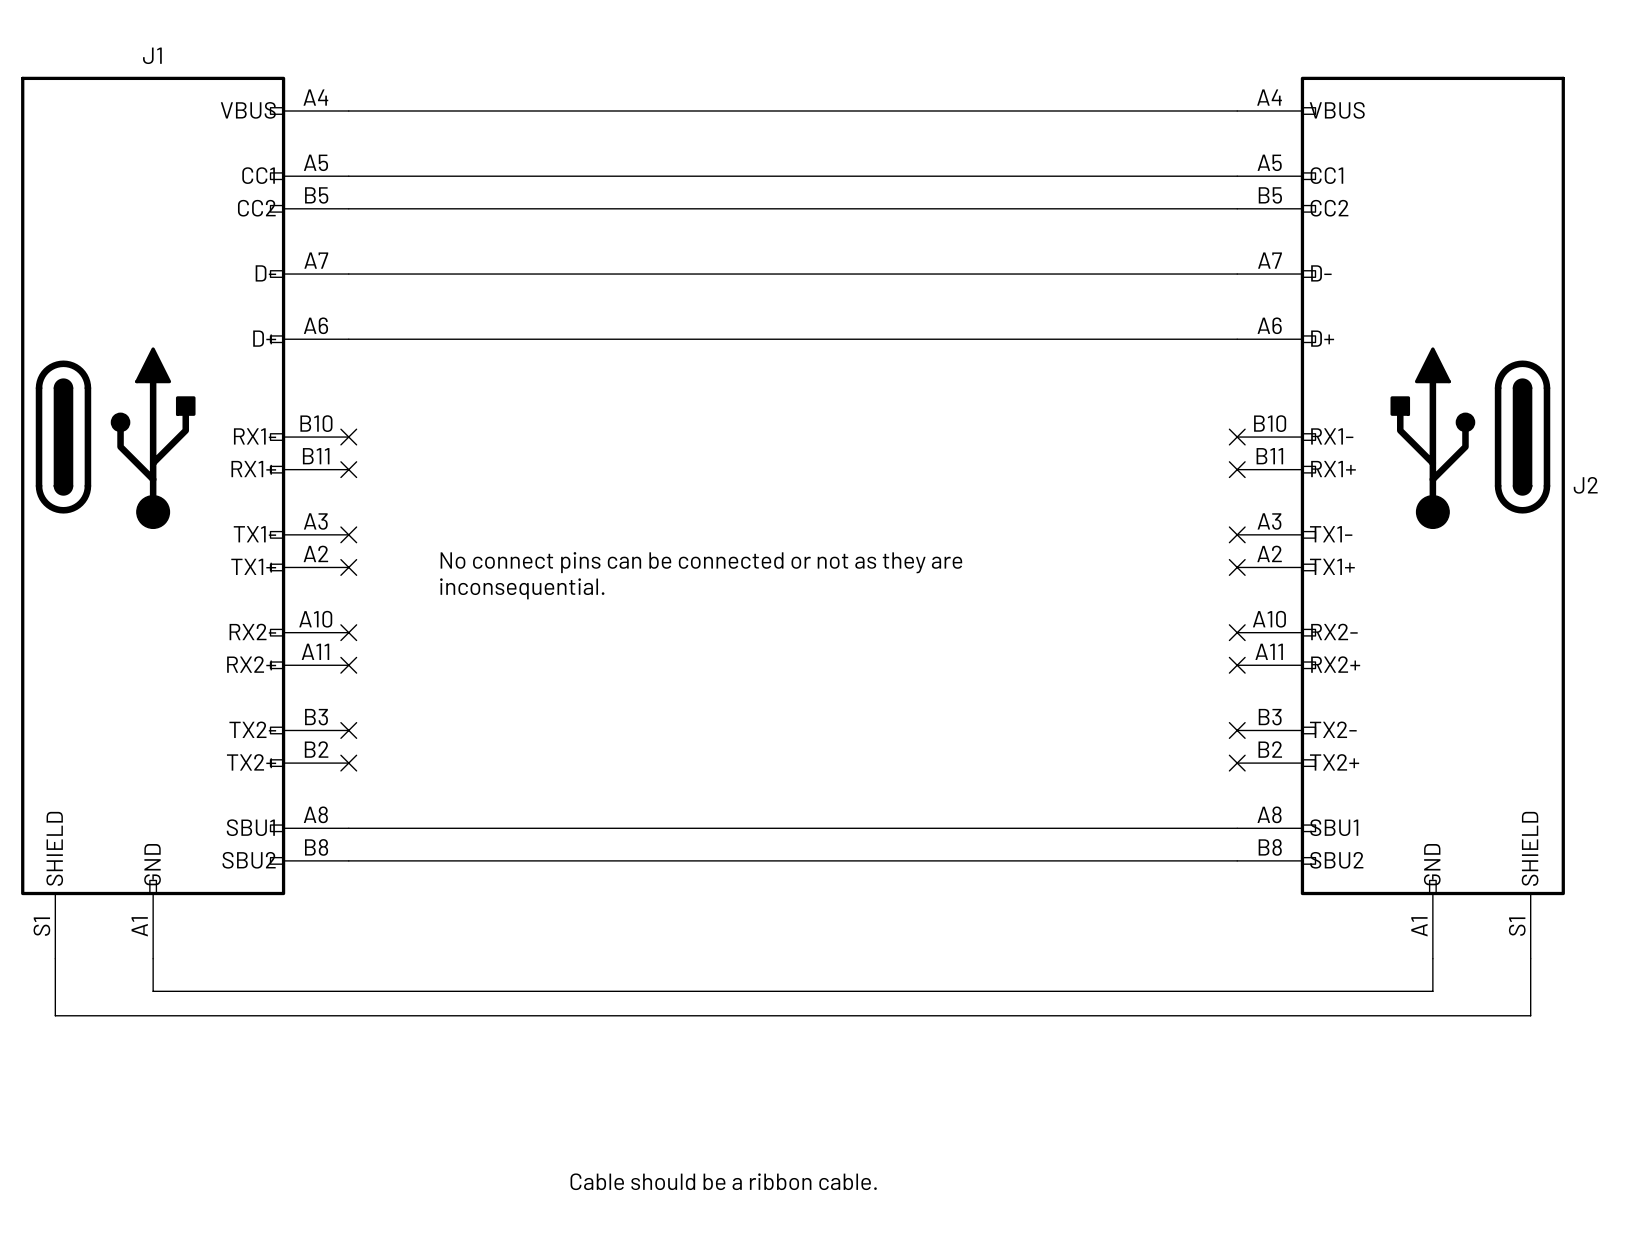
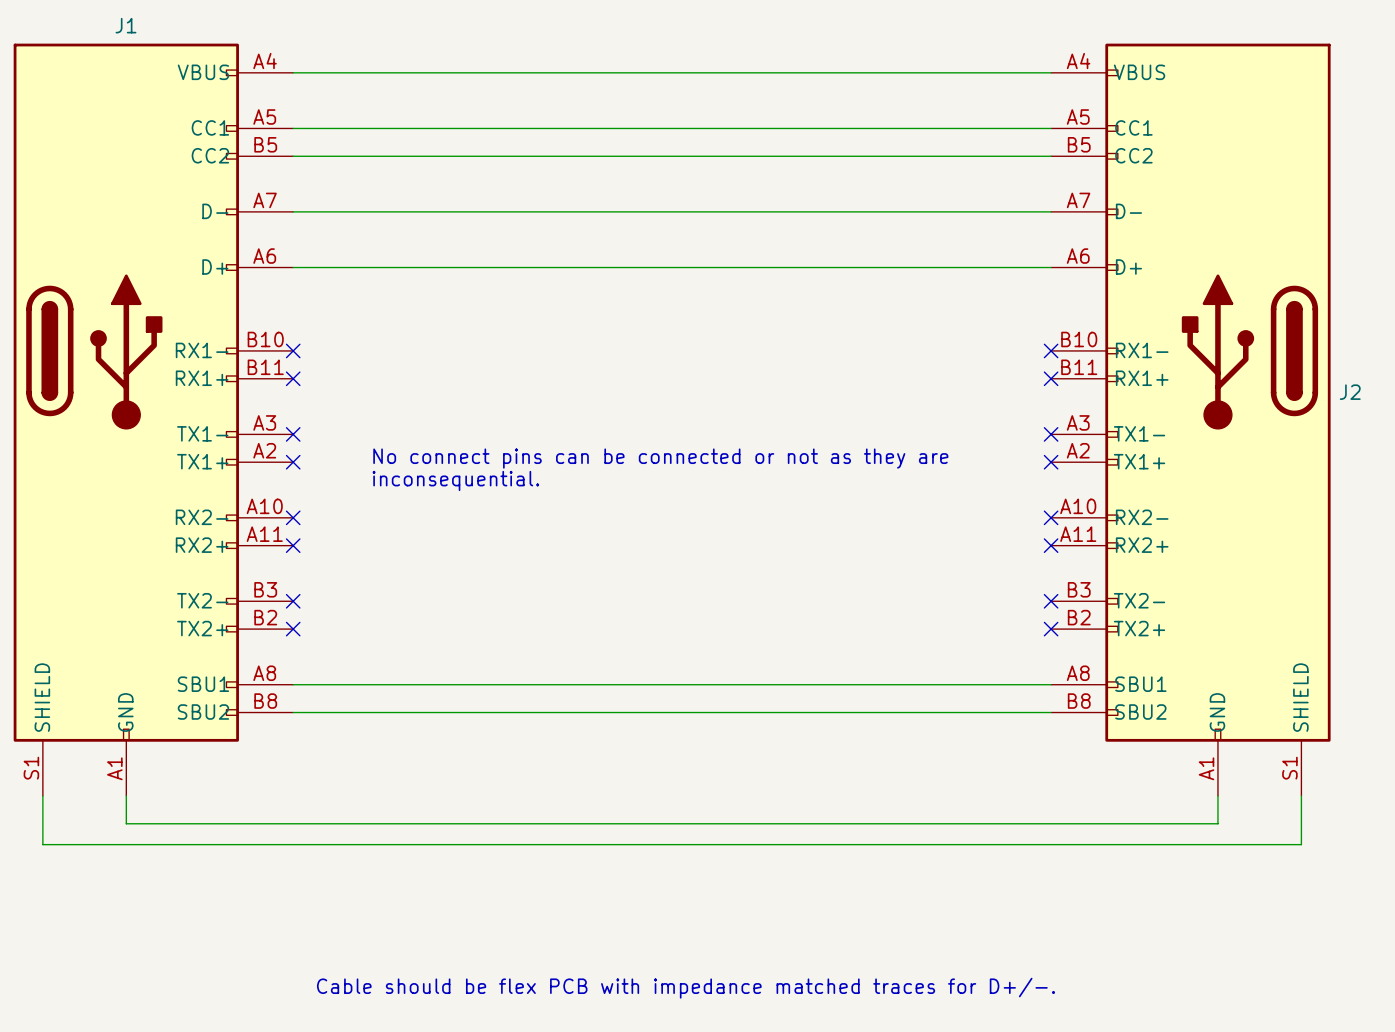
text: Cable should be a ribbon cable. (723, 1181) -> none
text: none -> Cable should be flex PCB with impedance matched traces for D+/-. (685, 988)

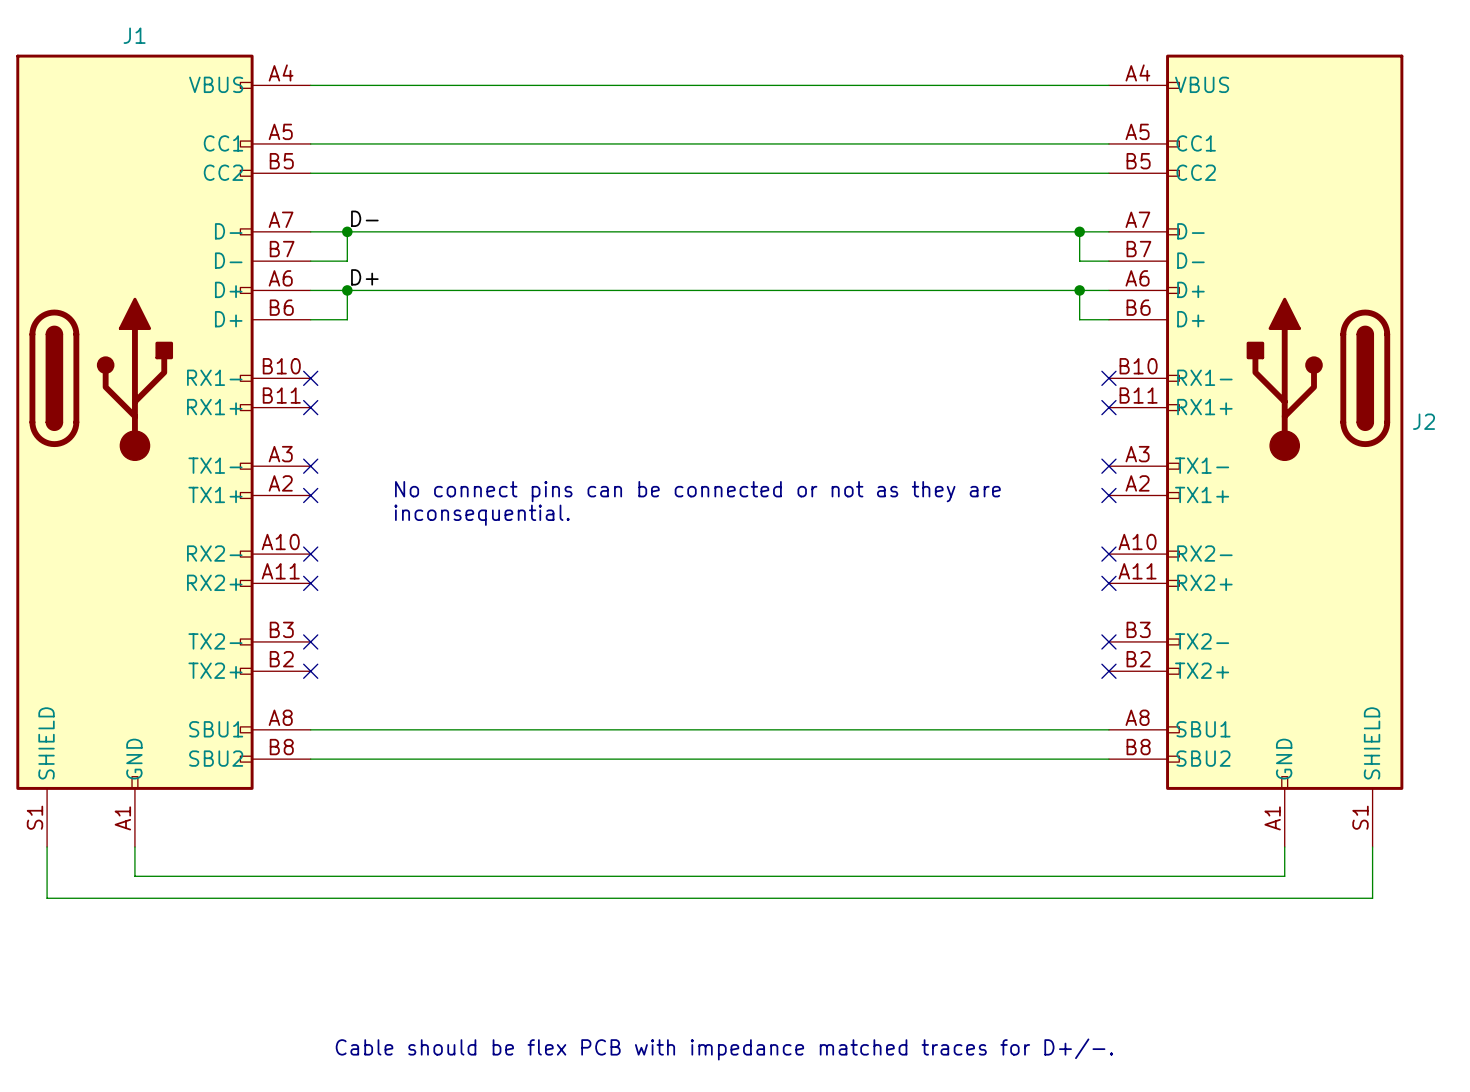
J1 symbol: [13, 43, 294, 796] -> [16, 54, 311, 848]
J2 symbol: [1051, 43, 1331, 796] -> [1108, 54, 1404, 848]
label: none -> D- (364, 218)
wire: none -> (347, 231) (347, 261) (310, 261)
junction: none -> (347, 231)
wire: none -> (1079, 231) (1079, 261) (1108, 261)
junction: none -> (1079, 231)
label: none -> D+ (364, 277)
wire: none -> (347, 290) (347, 319) (310, 319)
junction: none -> (347, 290)
wire: none -> (1079, 290) (1079, 319) (1108, 319)
junction: none -> (1079, 290)

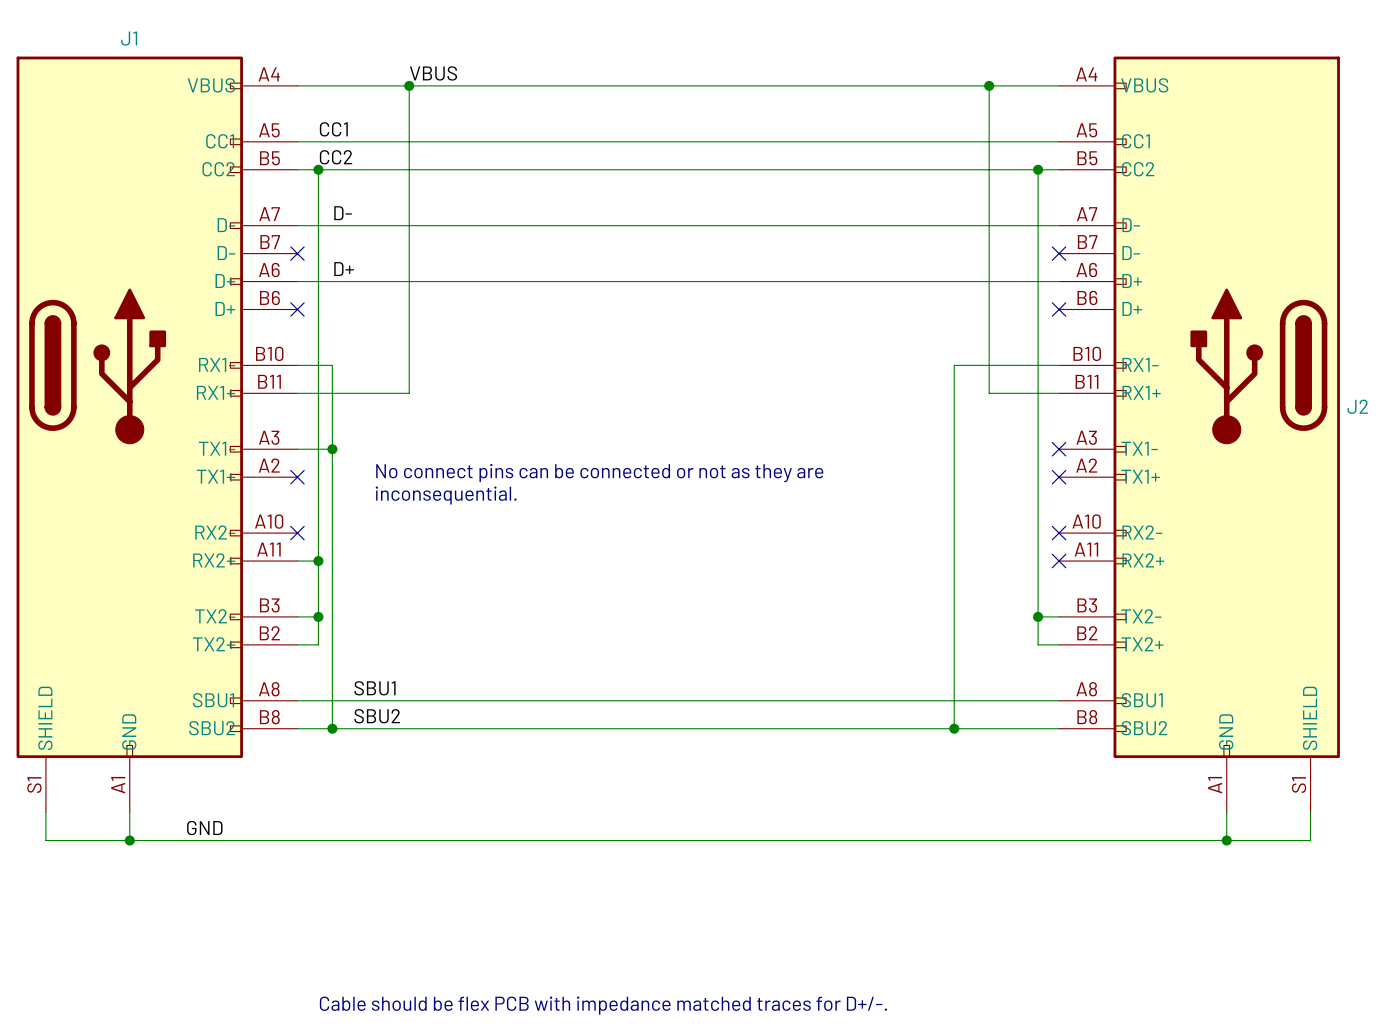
label: none -> VBUS (433, 73)
wire: none -> (409, 85) (409, 393) (297, 393)
junction: none -> (409, 85)
wire: none -> (989, 85) (989, 393) (1059, 393)
junction: none -> (989, 85)
label: none -> CC1 (333, 129)
label: none -> CC2 (336, 157)
wire: none -> (318, 169) (318, 644) (297, 644)
junction: none -> (318, 169)
wire: none -> (1038, 169) (1038, 644) (1059, 644)
junction: none -> (1038, 169)
wire: (347, 231) (347, 261) (310, 261) -> none
junction: (347, 231) -> none
wire: (1079, 231) (1079, 261) (1108, 261) -> none
junction: (1079, 231) -> none
no-connect mark: none -> (297, 253)
no-connect mark: none -> (1059, 253)
wire: (347, 290) (347, 319) (310, 319) -> none
junction: (347, 290) -> none
wire: (1079, 290) (1079, 319) (1108, 319) -> none
junction: (1079, 290) -> none
no-connect mark: none -> (297, 309)
no-connect mark: none -> (1059, 309)
wire: none -> (297, 365) (332, 365) (332, 728)
no-connect mark: (310, 378) -> none
wire: none -> (1059, 365) (954, 365) (954, 728)
no-connect mark: (1108, 378) -> none
no-connect mark: (310, 407) -> none
no-connect mark: (1108, 407) -> none
wire: none -> (297, 449) (332, 449)
no-connect mark: (310, 466) -> none
junction: none -> (332, 449)
wire: none -> (297, 561) (318, 561)
no-connect mark: (310, 583) -> none
junction: none -> (318, 561)
wire: none -> (297, 616) (318, 616)
no-connect mark: (310, 641) -> none
junction: none -> (318, 616)
wire: none -> (1038, 616) (1059, 616)
junction: none -> (1038, 616)
no-connect mark: (1108, 641) -> none
no-connect mark: (310, 671) -> none
no-connect mark: (1108, 671) -> none
label: none -> SBU1 (374, 688)
label: none -> SBU2 (377, 716)
junction: none -> (332, 728)
junction: none -> (954, 728)
label: none -> GND (204, 828)
wire: (47, 876) (47, 898) (1372, 898) (1372, 876) -> (45, 840) (129, 840)
junction: none -> (129, 840)
wire: none -> (1226, 840) (1310, 840)
junction: none -> (1226, 840)

